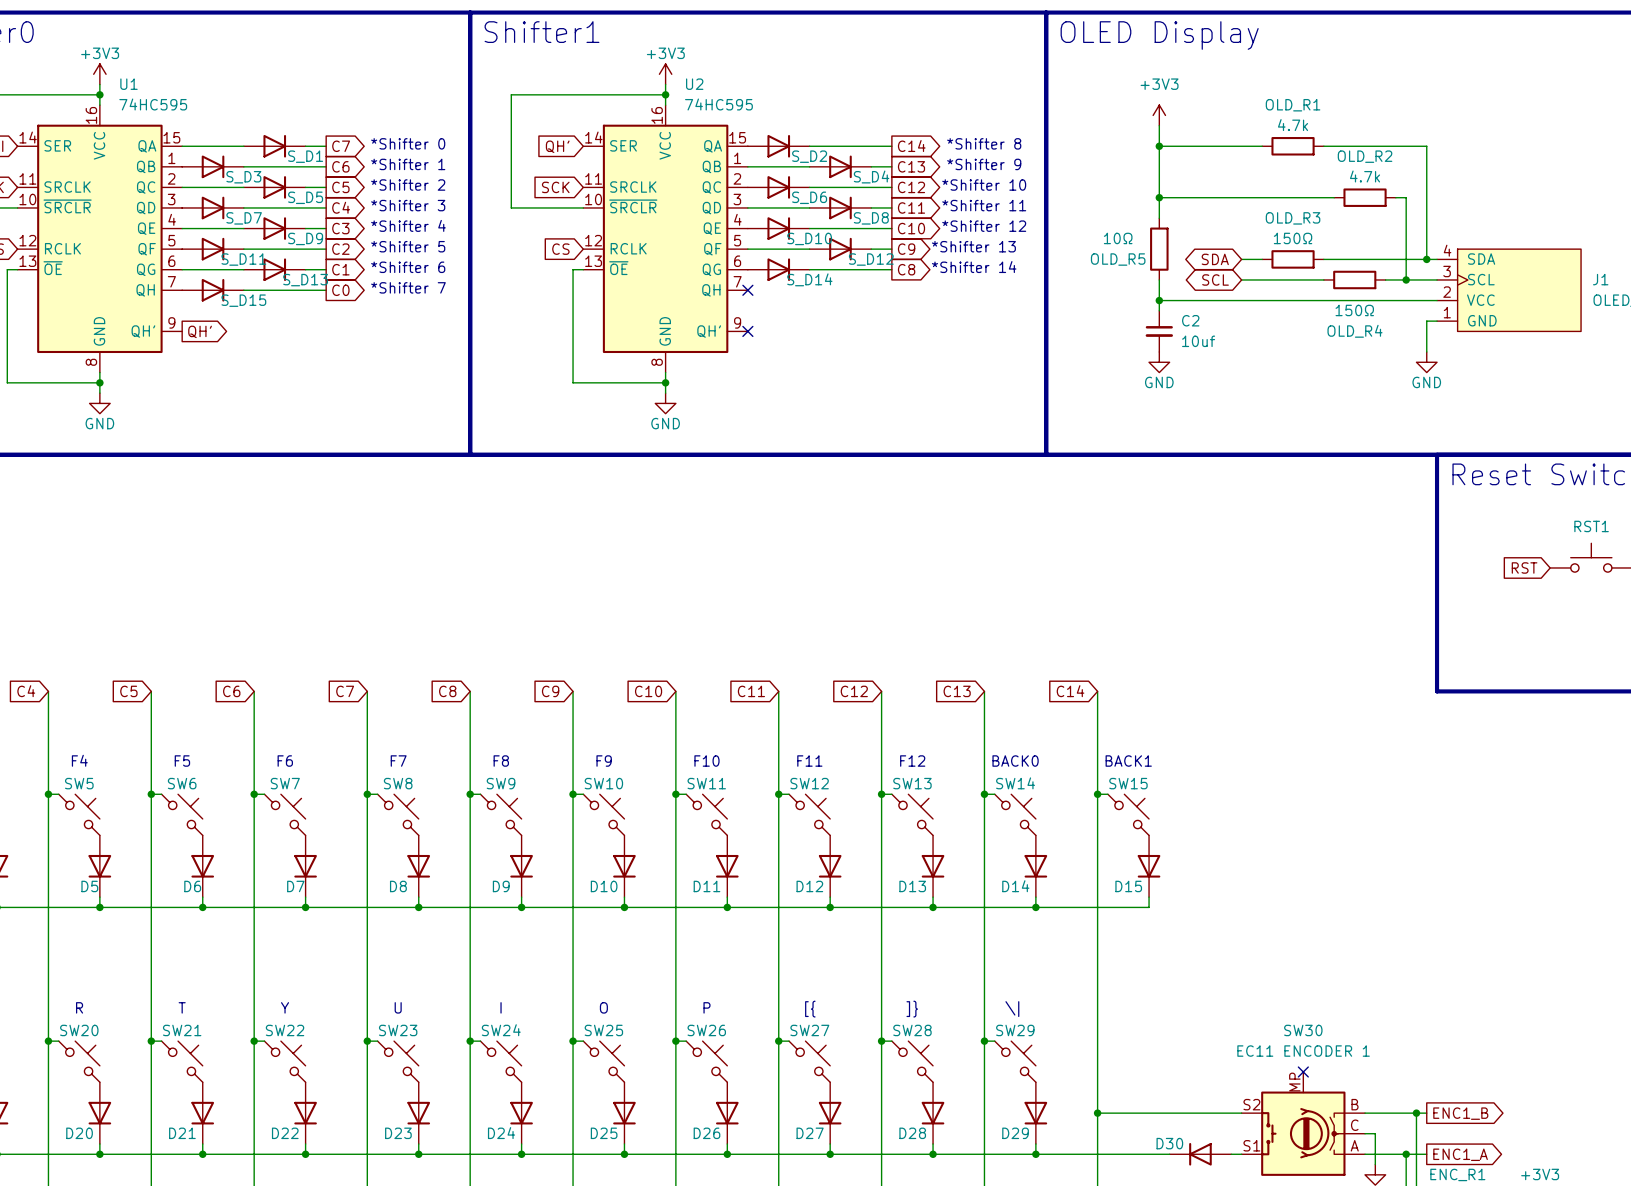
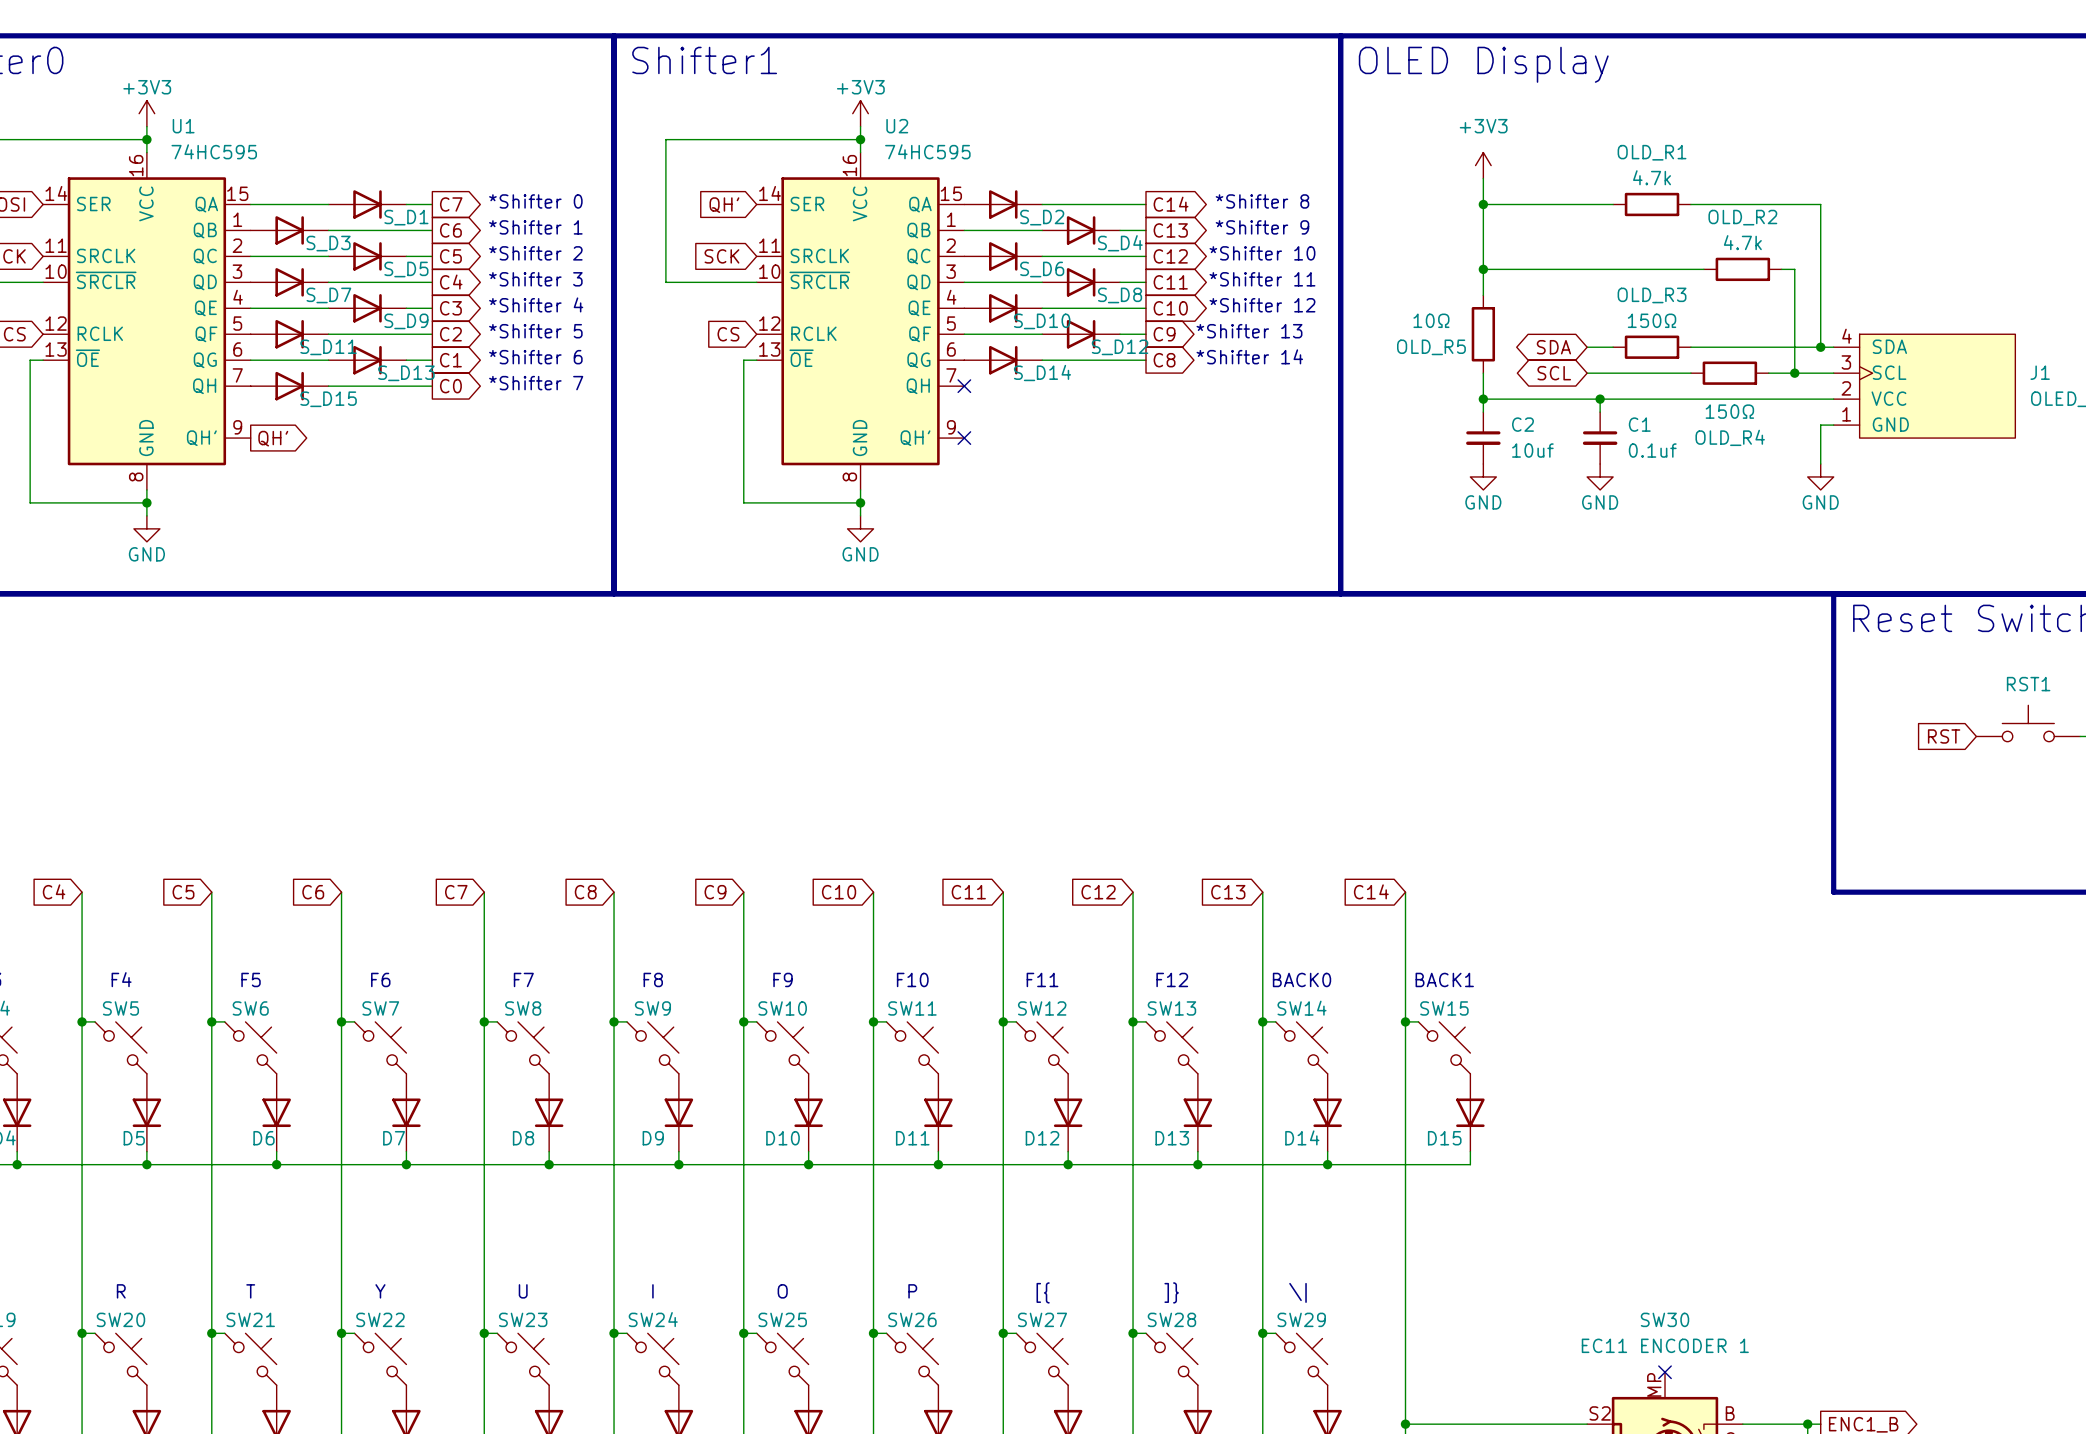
wire: none -> (1600, 399) (1600, 412)
junction: none -> (1600, 399)
C1: none -> 0.1uf (1600, 438)
power symbol: none -> GND (1600, 476)

